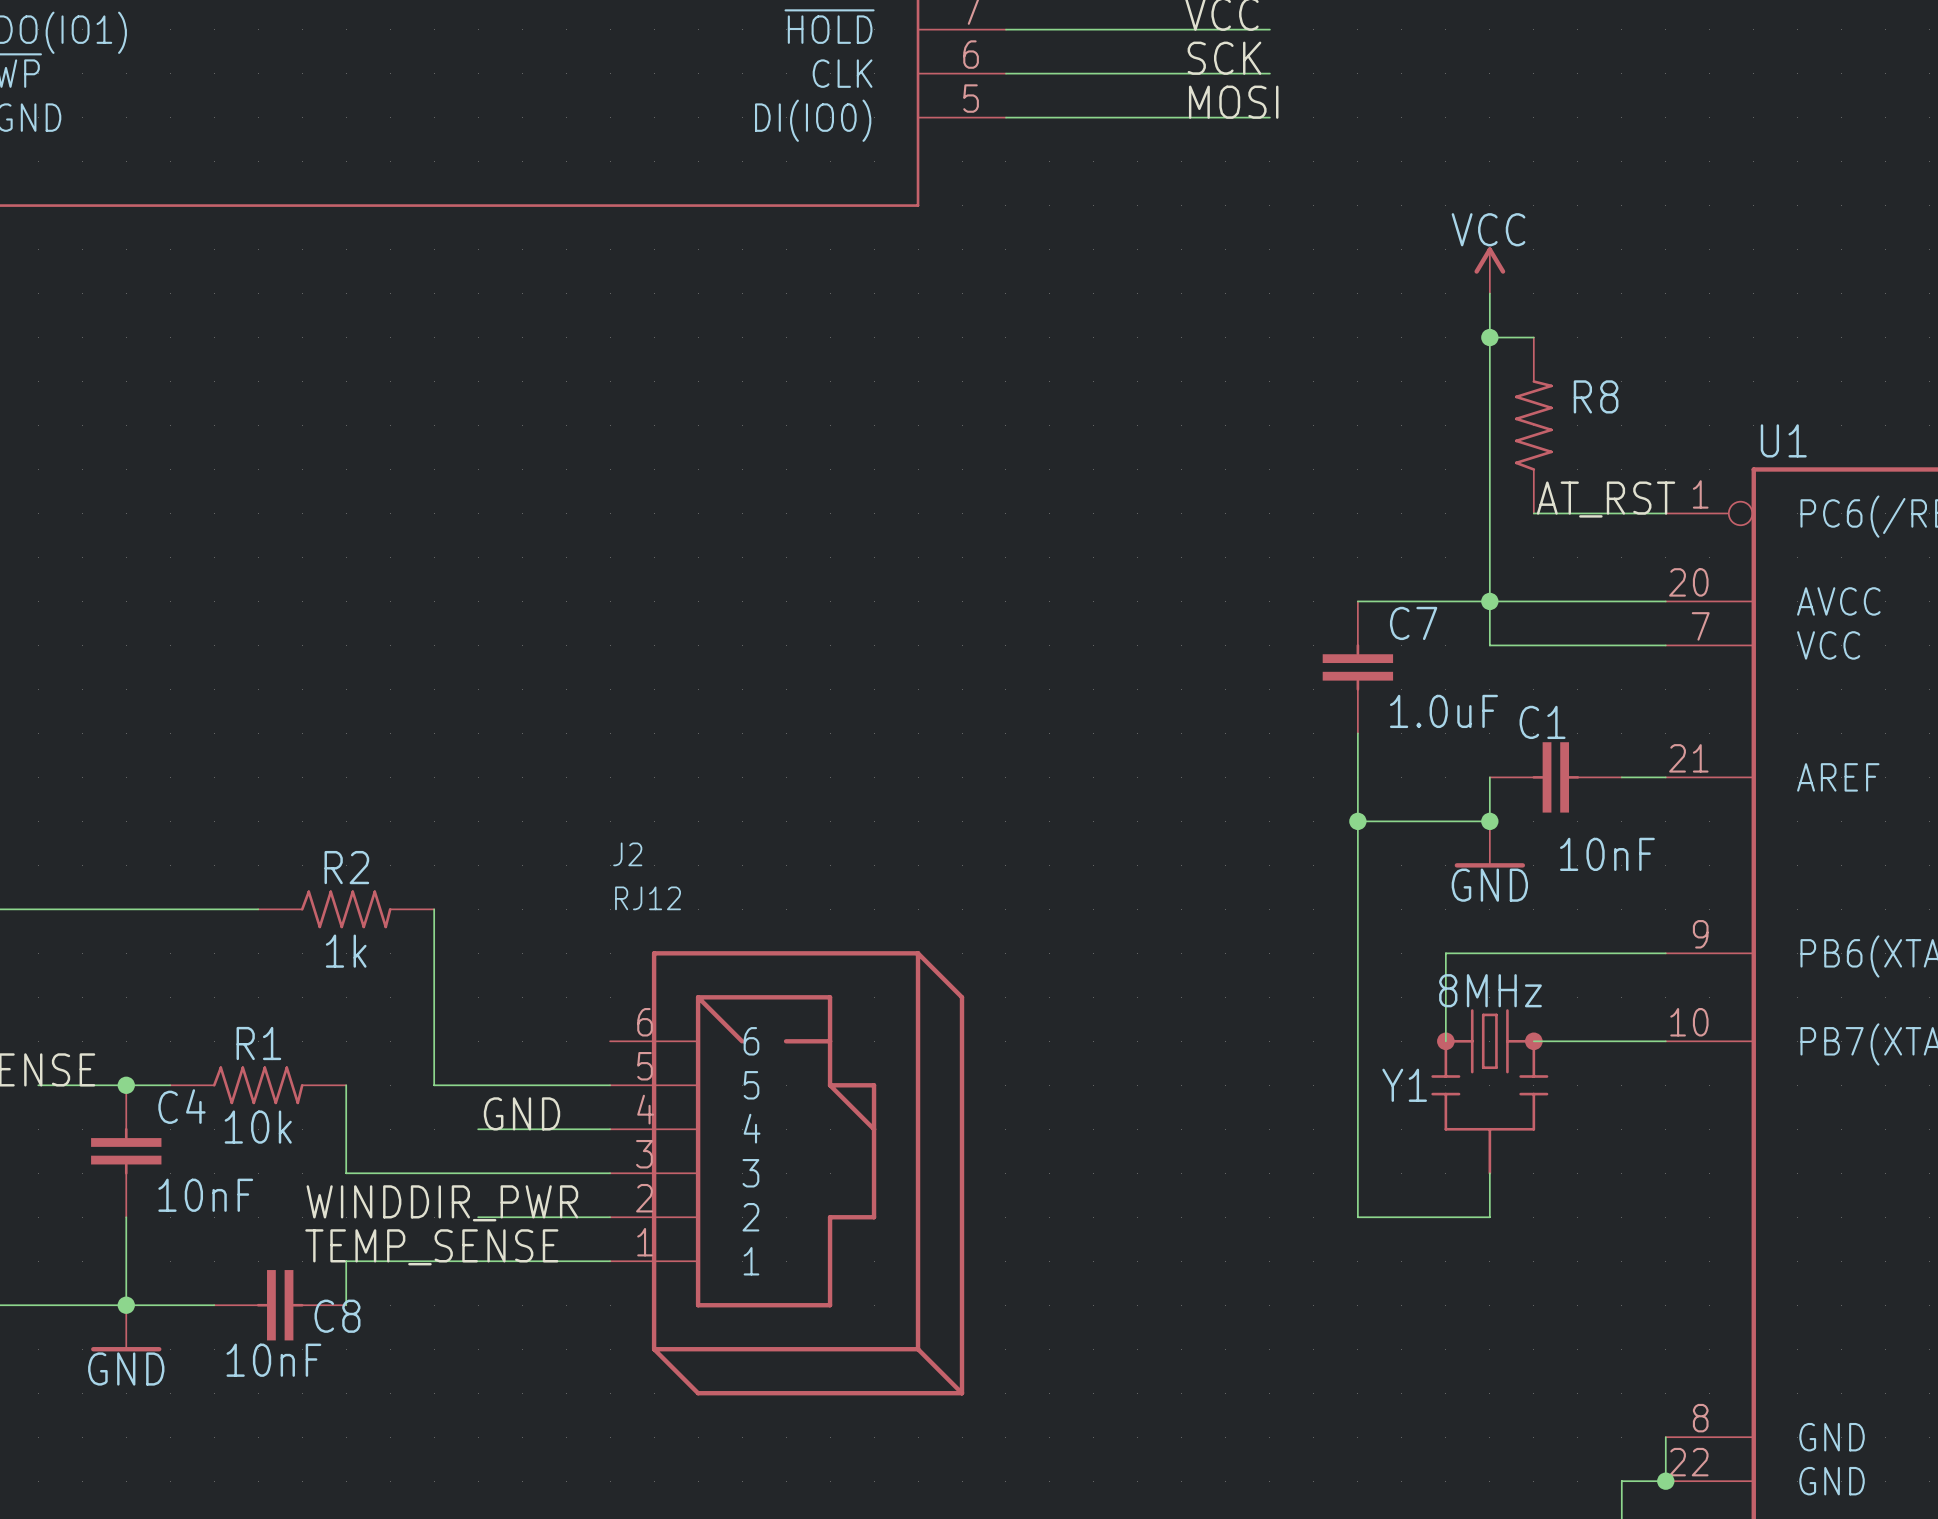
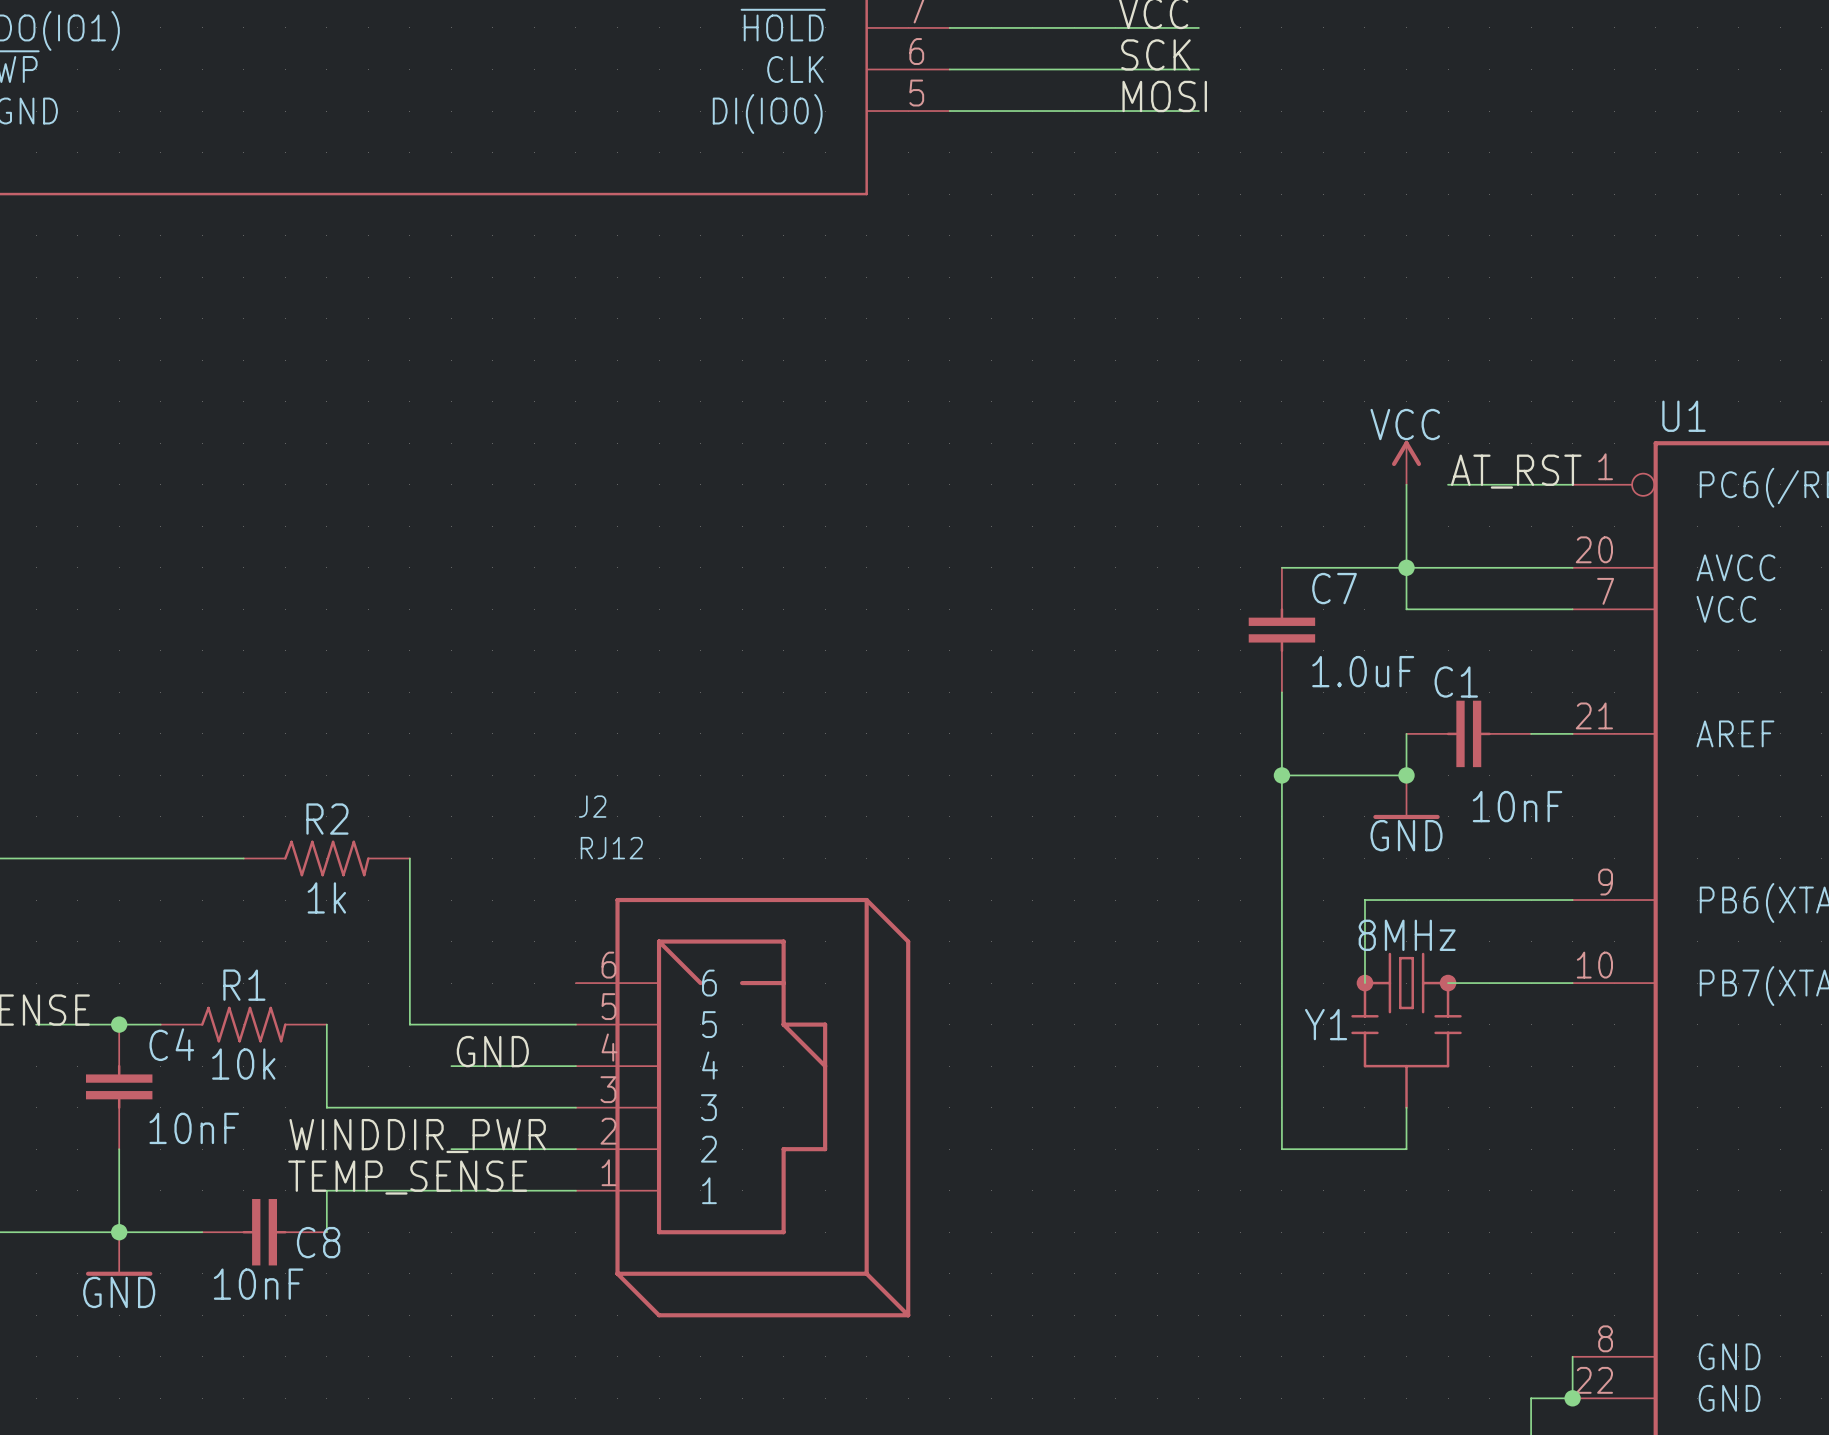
power symbol position: VCC (1489, 270) -> VCC (1406, 462)
wire: (1489, 293) (1489, 513) -> none
wire: (1489, 337) (1533, 337) -> none
junction: (1489, 337) -> none
R8: (1533, 425) -> none

